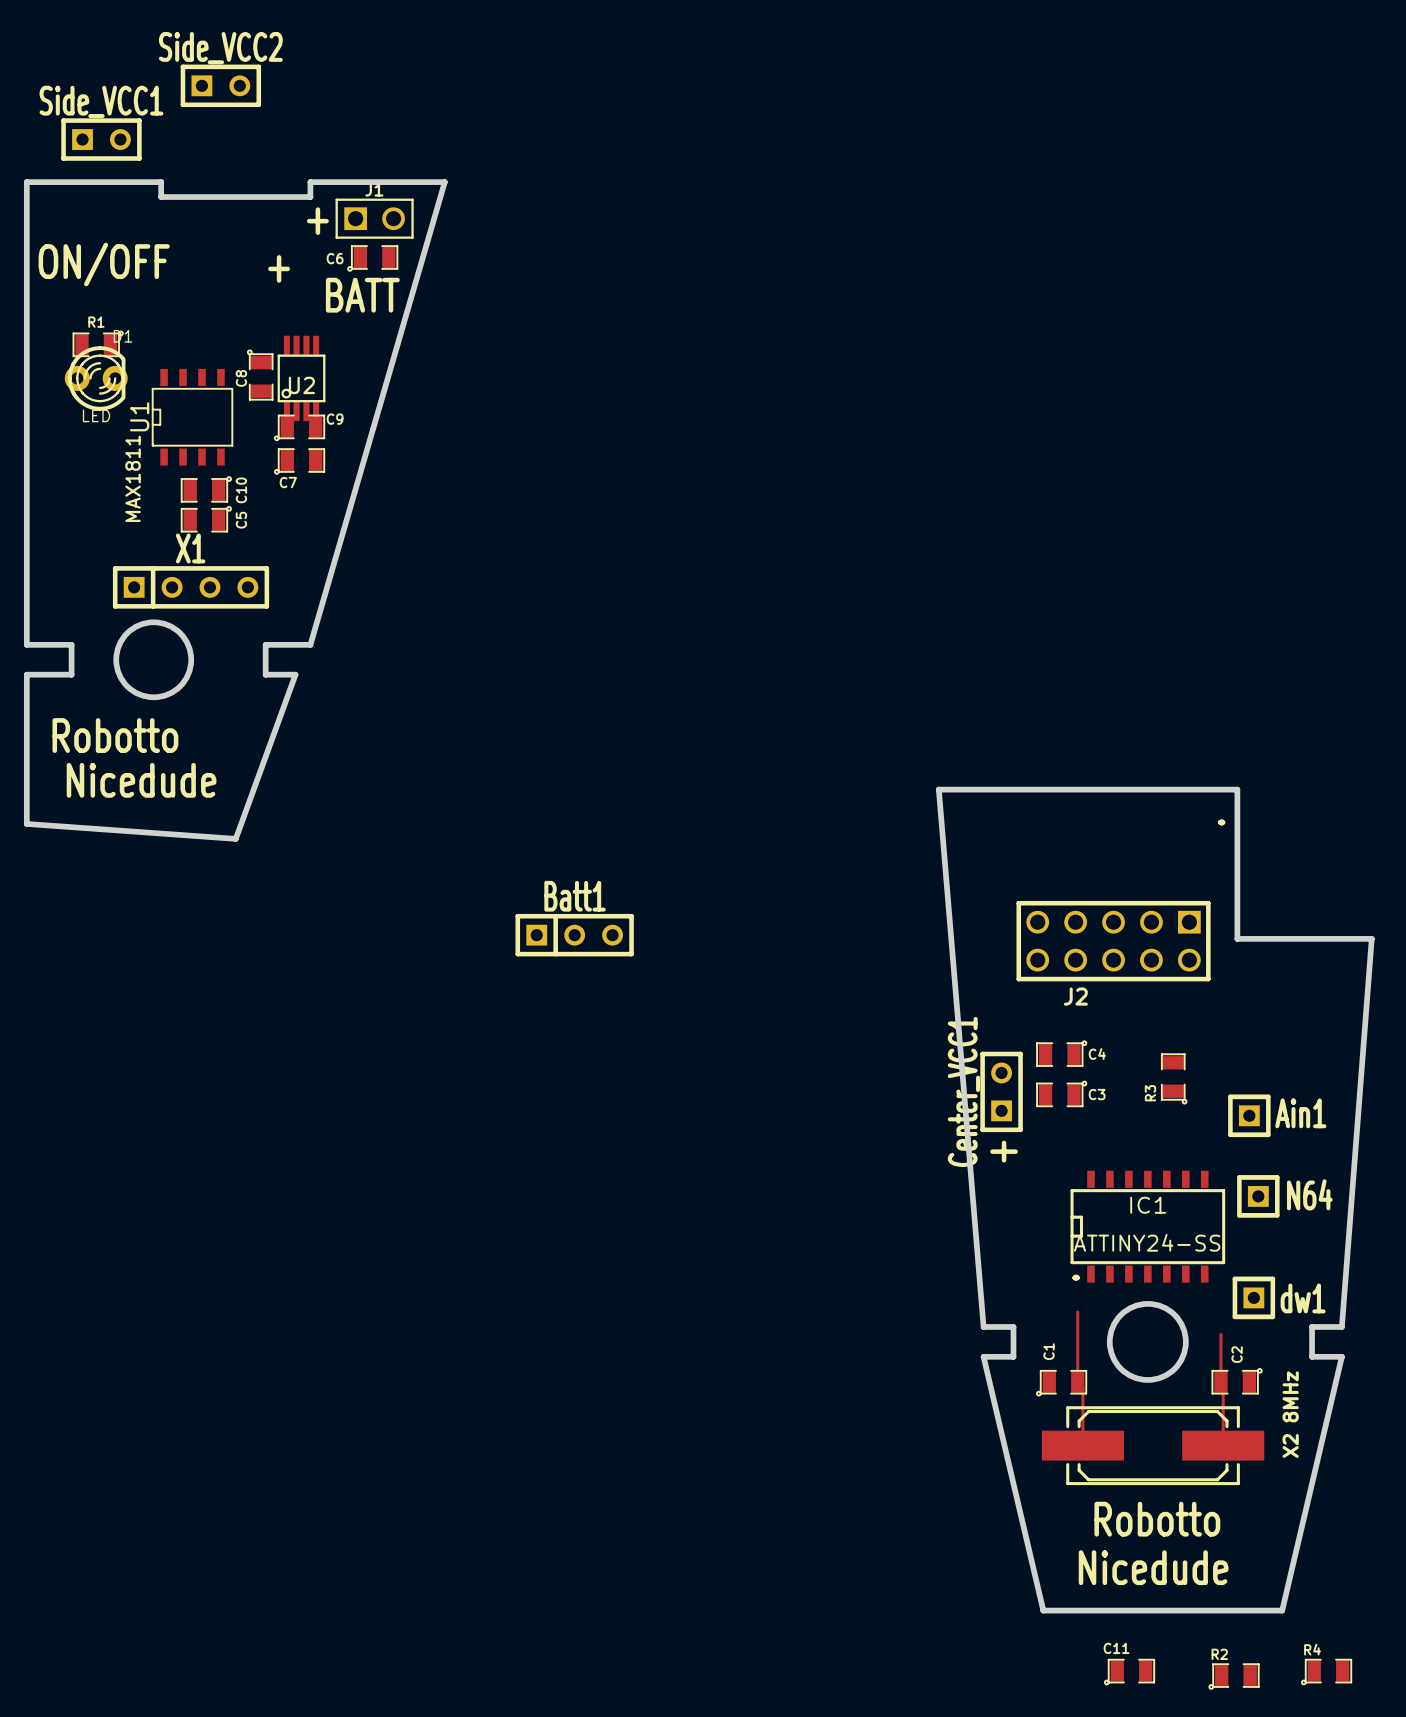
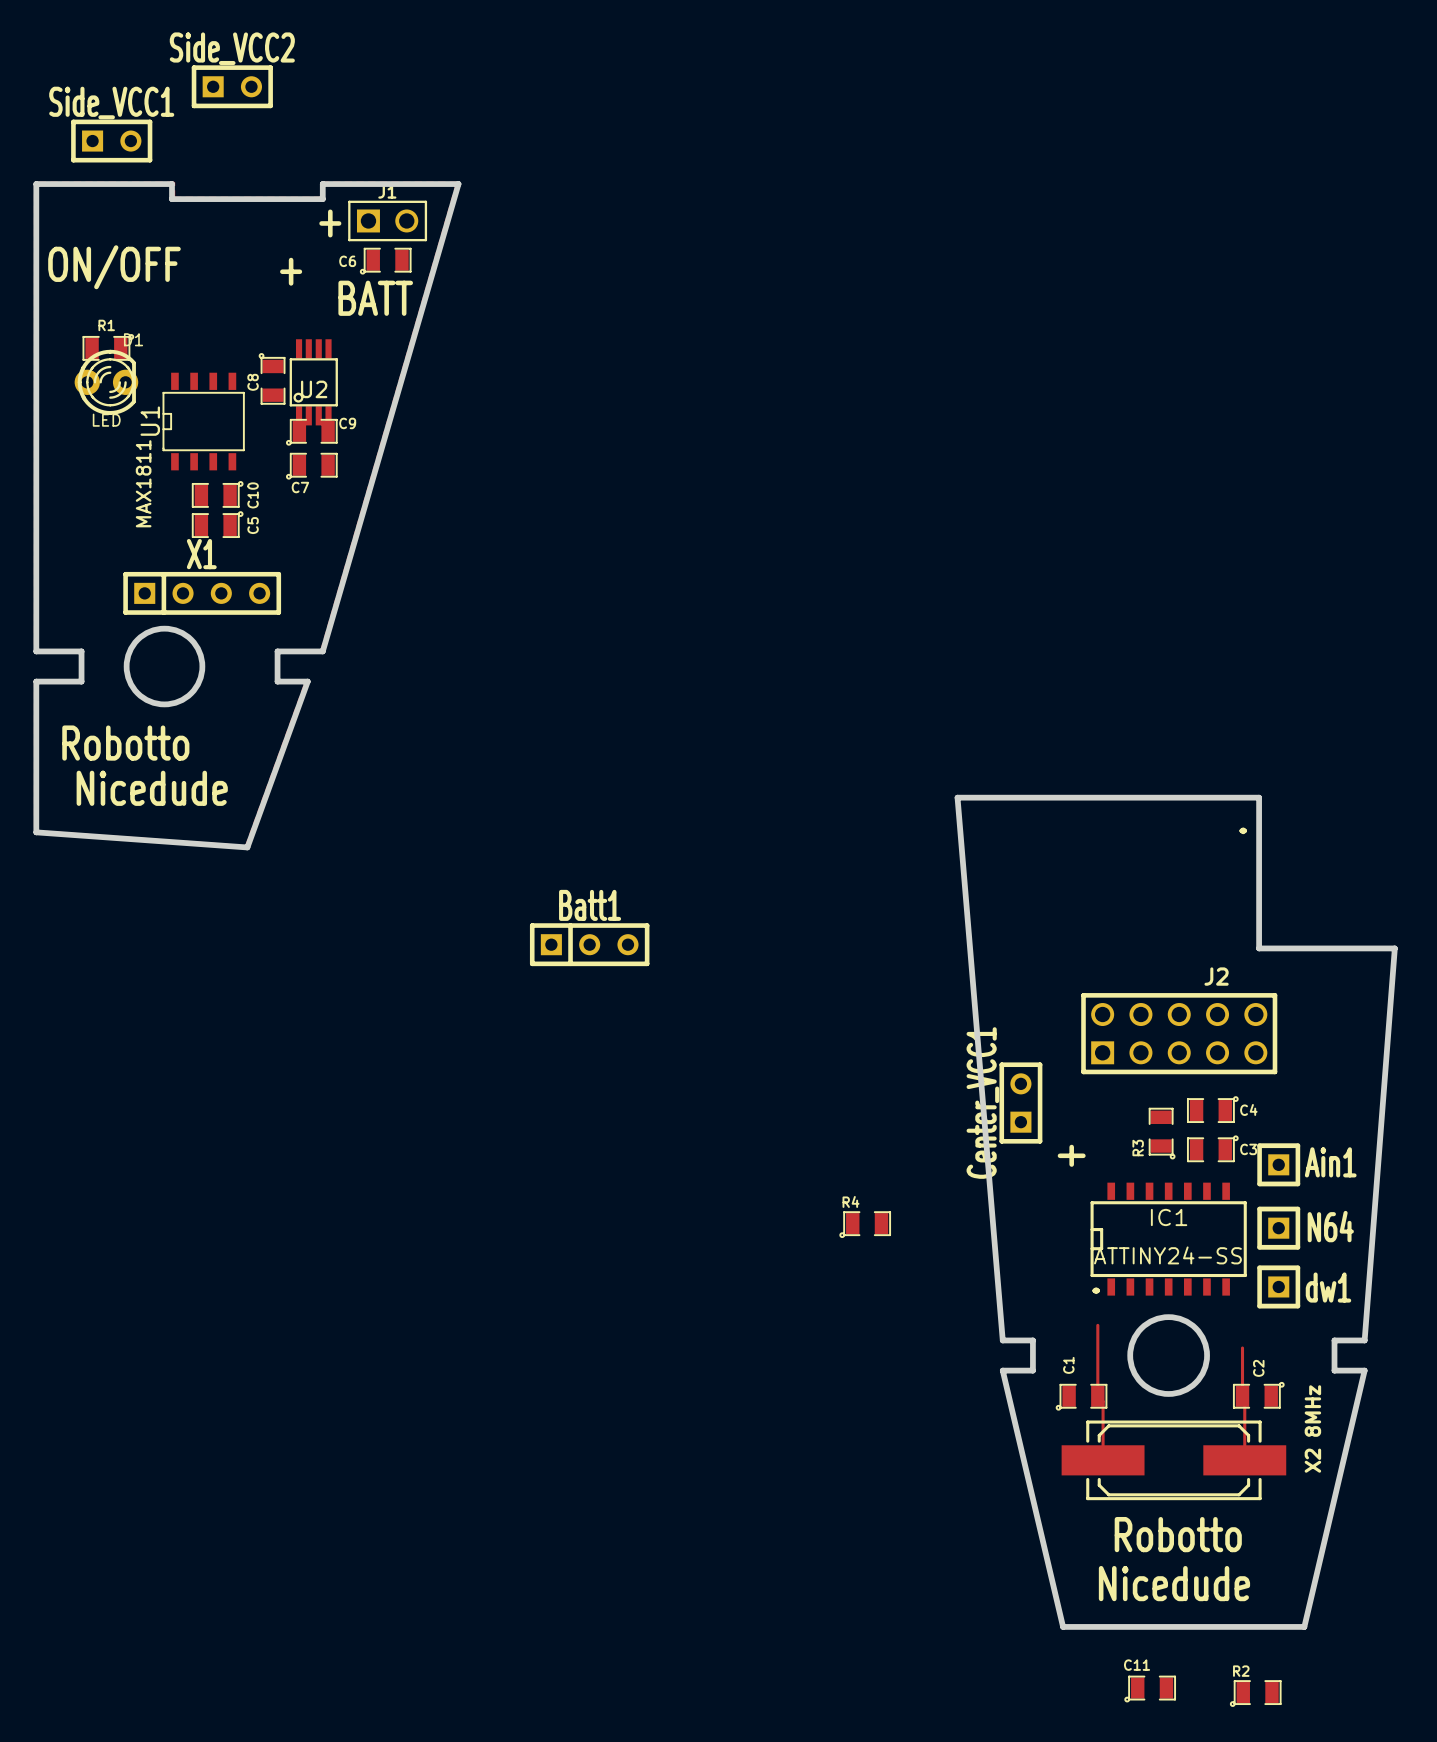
J2 rotation: 0° (1113, 941) -> 180° (1179, 1033)
C4 position: (1061, 1053) -> (1212, 1109)
R3 position: (1174, 1078) -> (1162, 1133)
C3 position: (1061, 1093) -> (1212, 1148)
Ain1 position: (1249, 1115) -> (1278, 1164)
text position: + (1004, 1151) -> + (1071, 1155)
N64 position: (1258, 1196) -> (1278, 1228)
dw1 position: (1253, 1297) -> (1278, 1286)
R4 position: (1326, 1672) -> (865, 1224)

